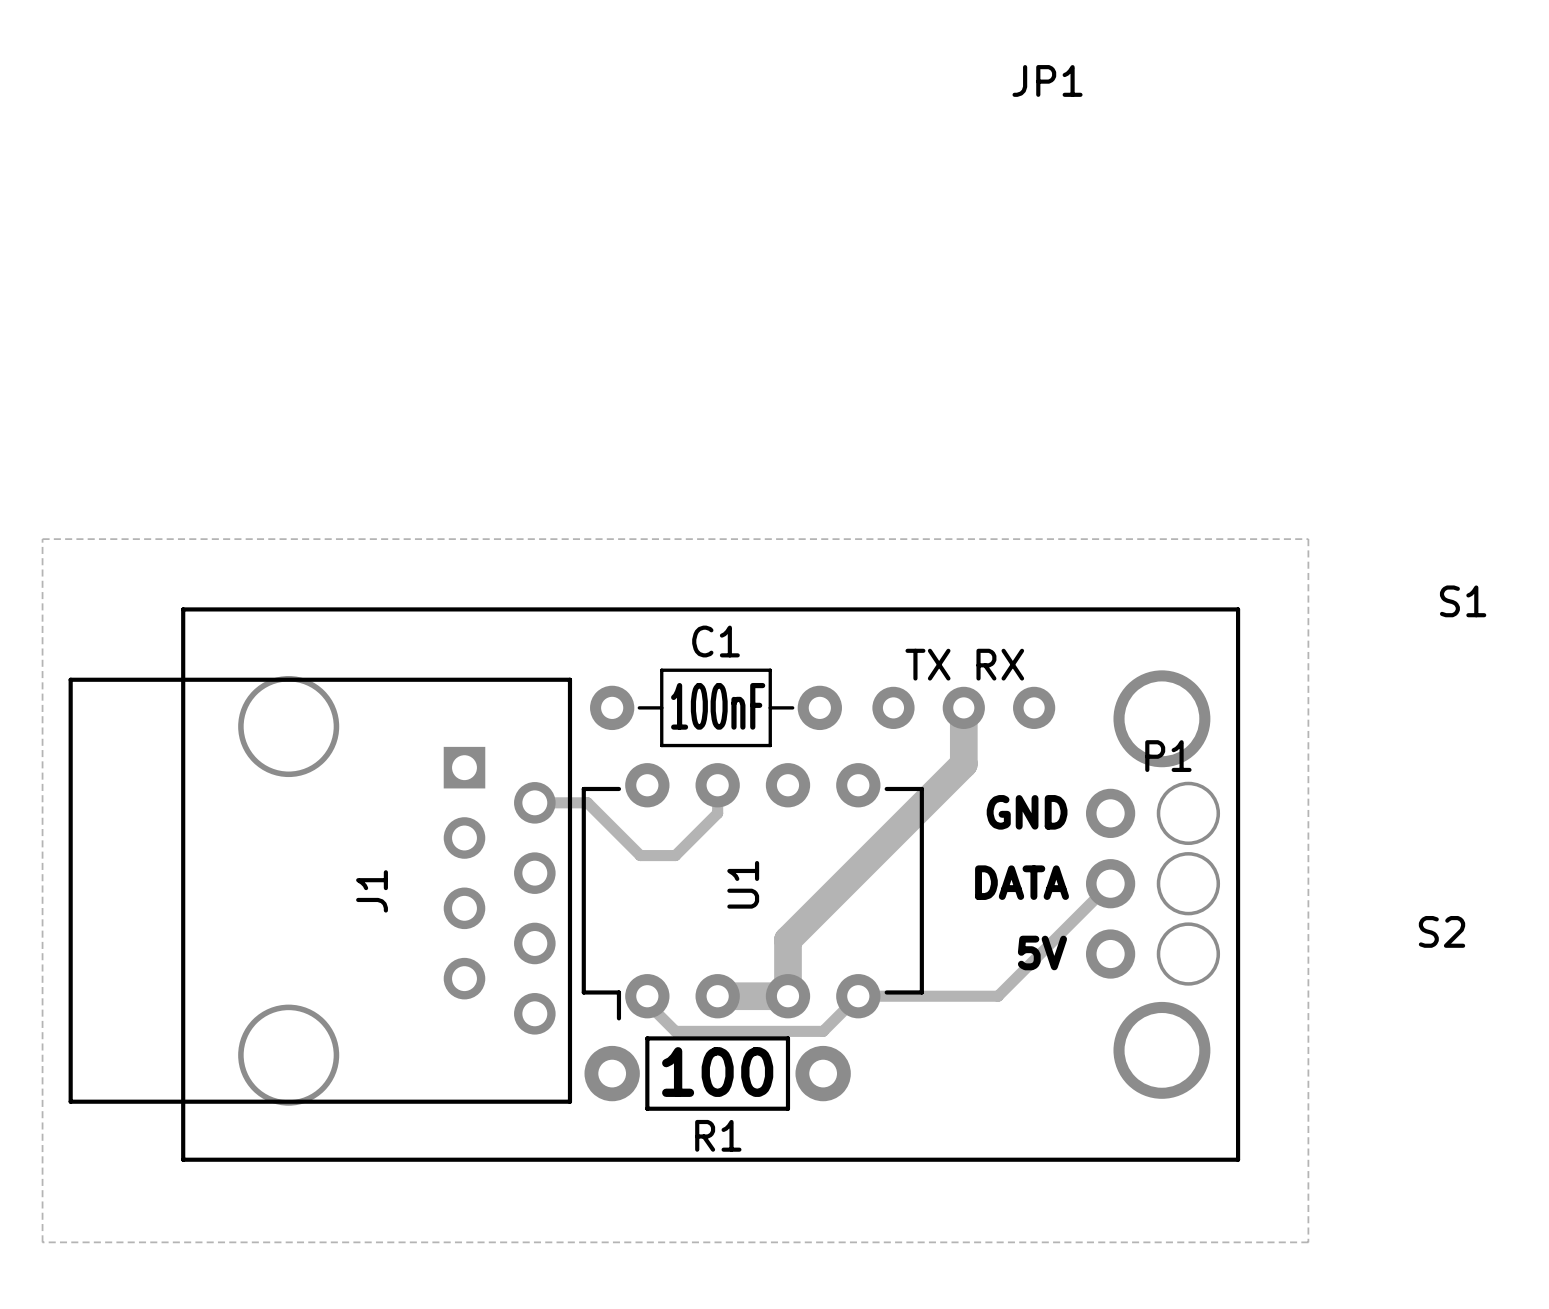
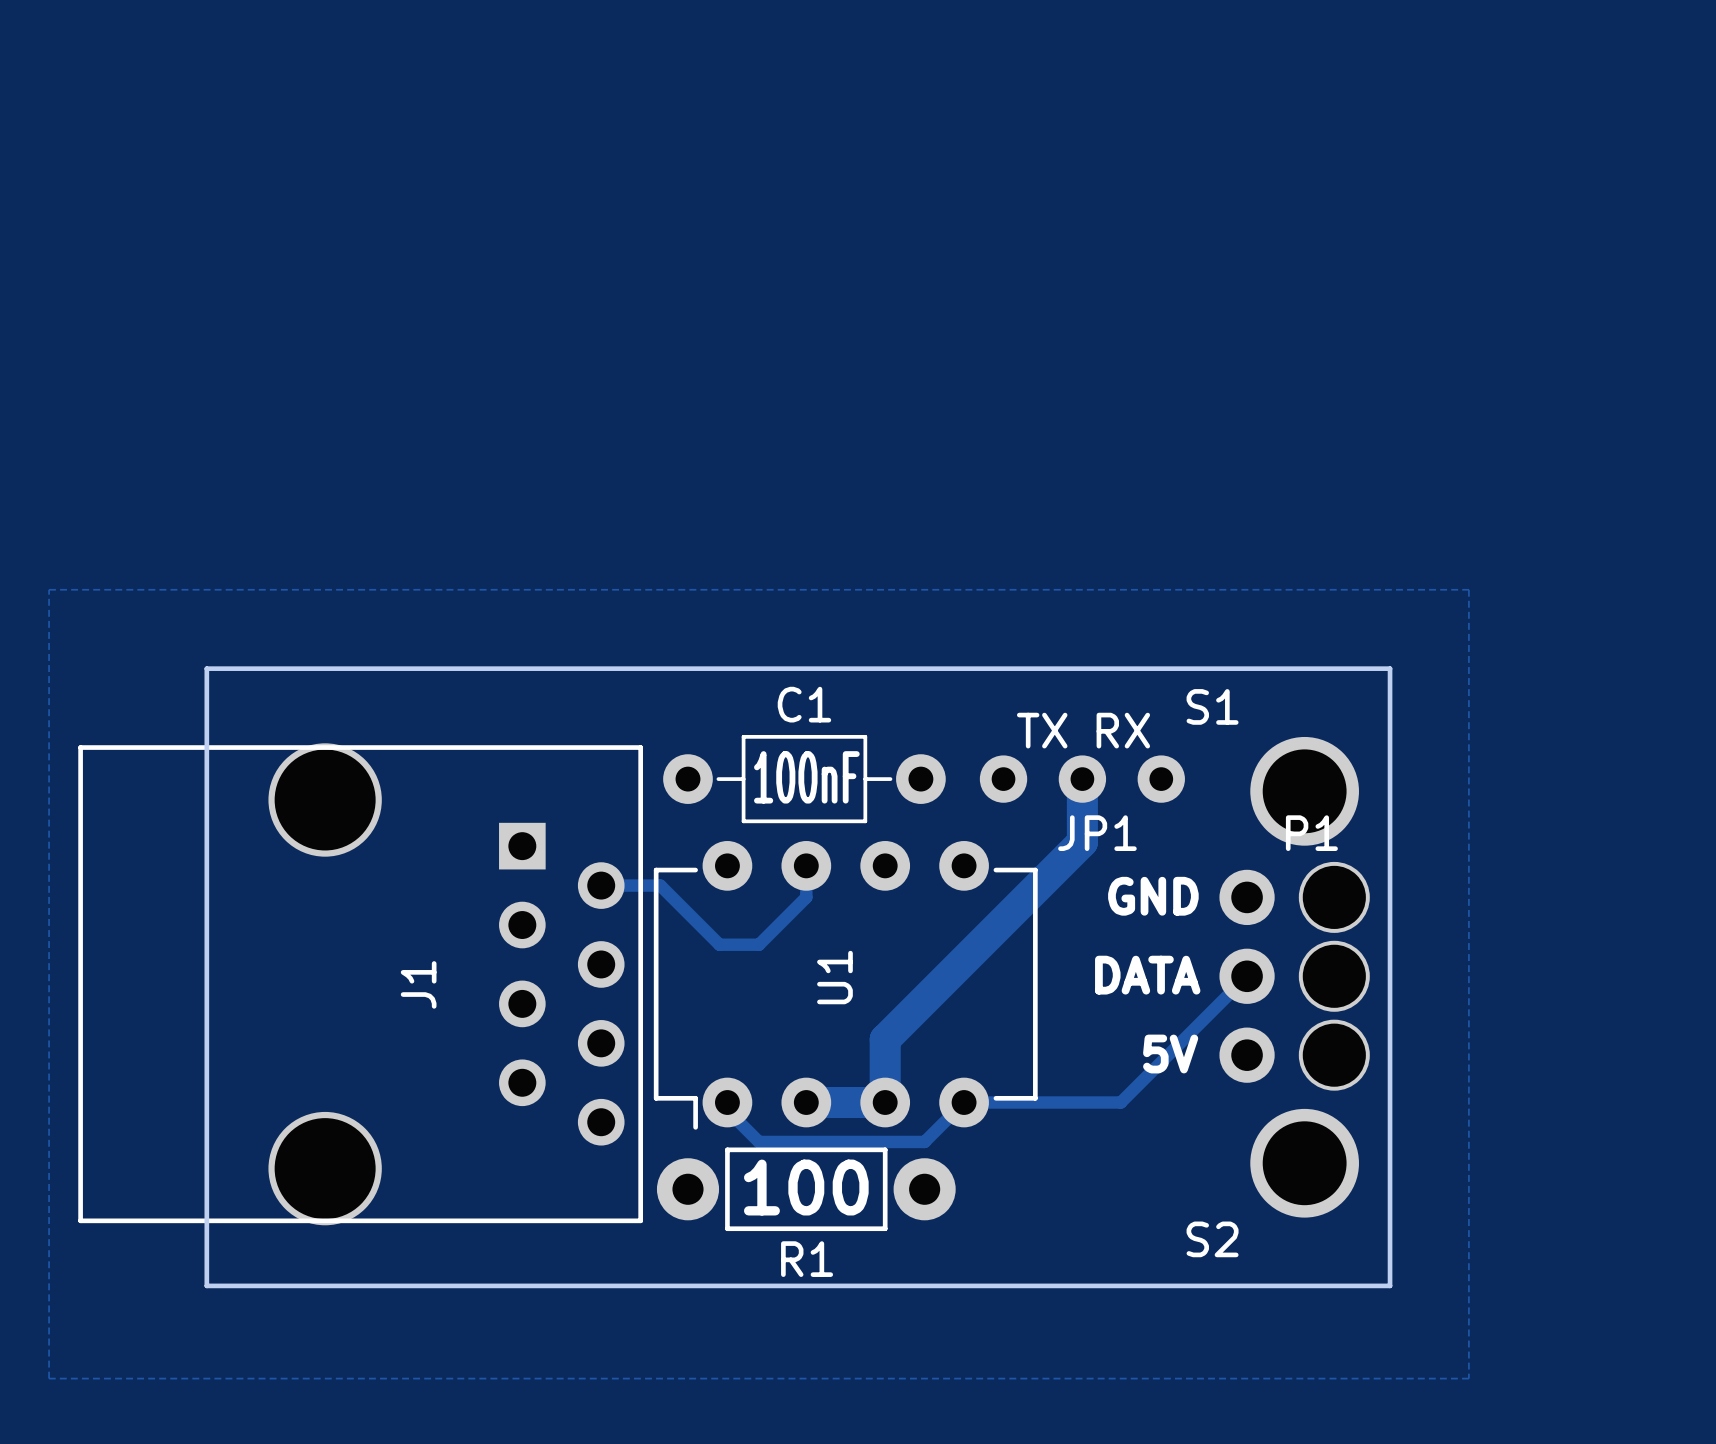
JP1 name position: JP1 (1047, 80) -> JP1 (1097, 833)
S1 name position: S1 (1463, 601) -> S1 (1212, 706)
S2 name position: S2 (1442, 931) -> S2 (1212, 1239)

